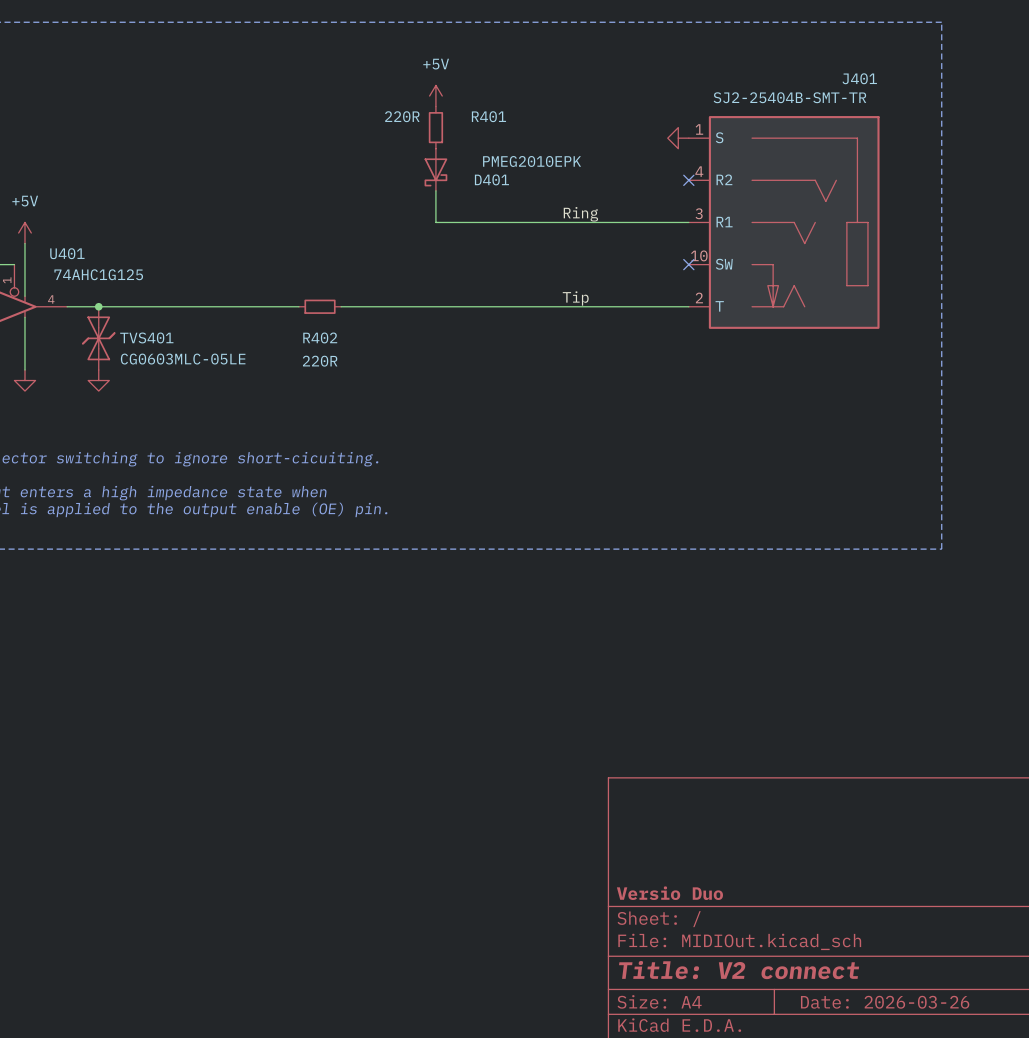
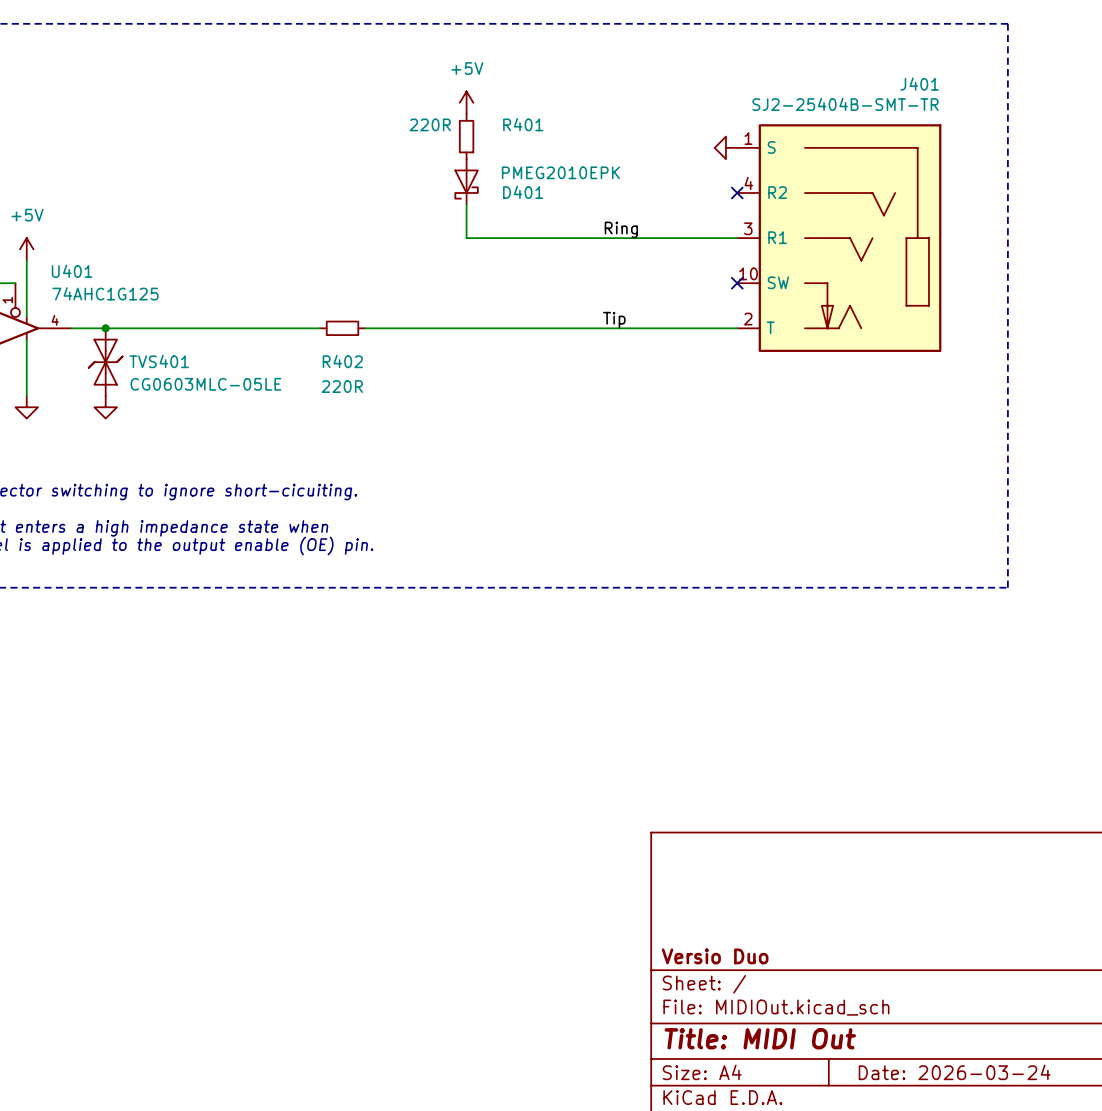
title block: Title: V2 connect (739, 970) -> Title: MIDI Out (760, 1038)
title block: Date: 2026-03-26 (885, 1002) -> Date: 2026-03-24 (954, 1072)

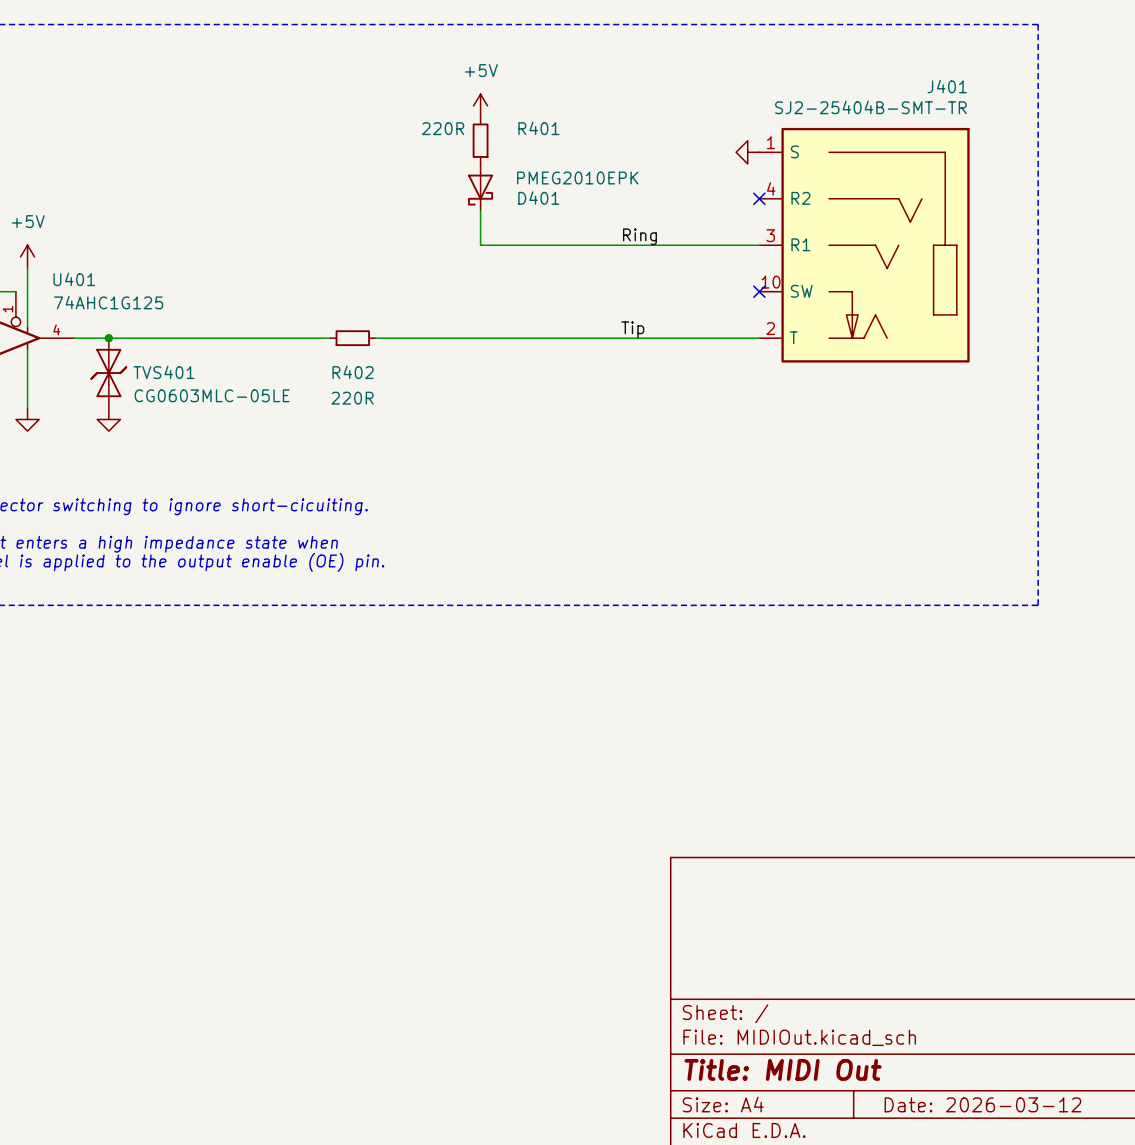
title block: Versio Duo (715, 956) -> none
title block: Date: 2026-03-24 (954, 1072) -> Date: 2026-03-12 (982, 1104)

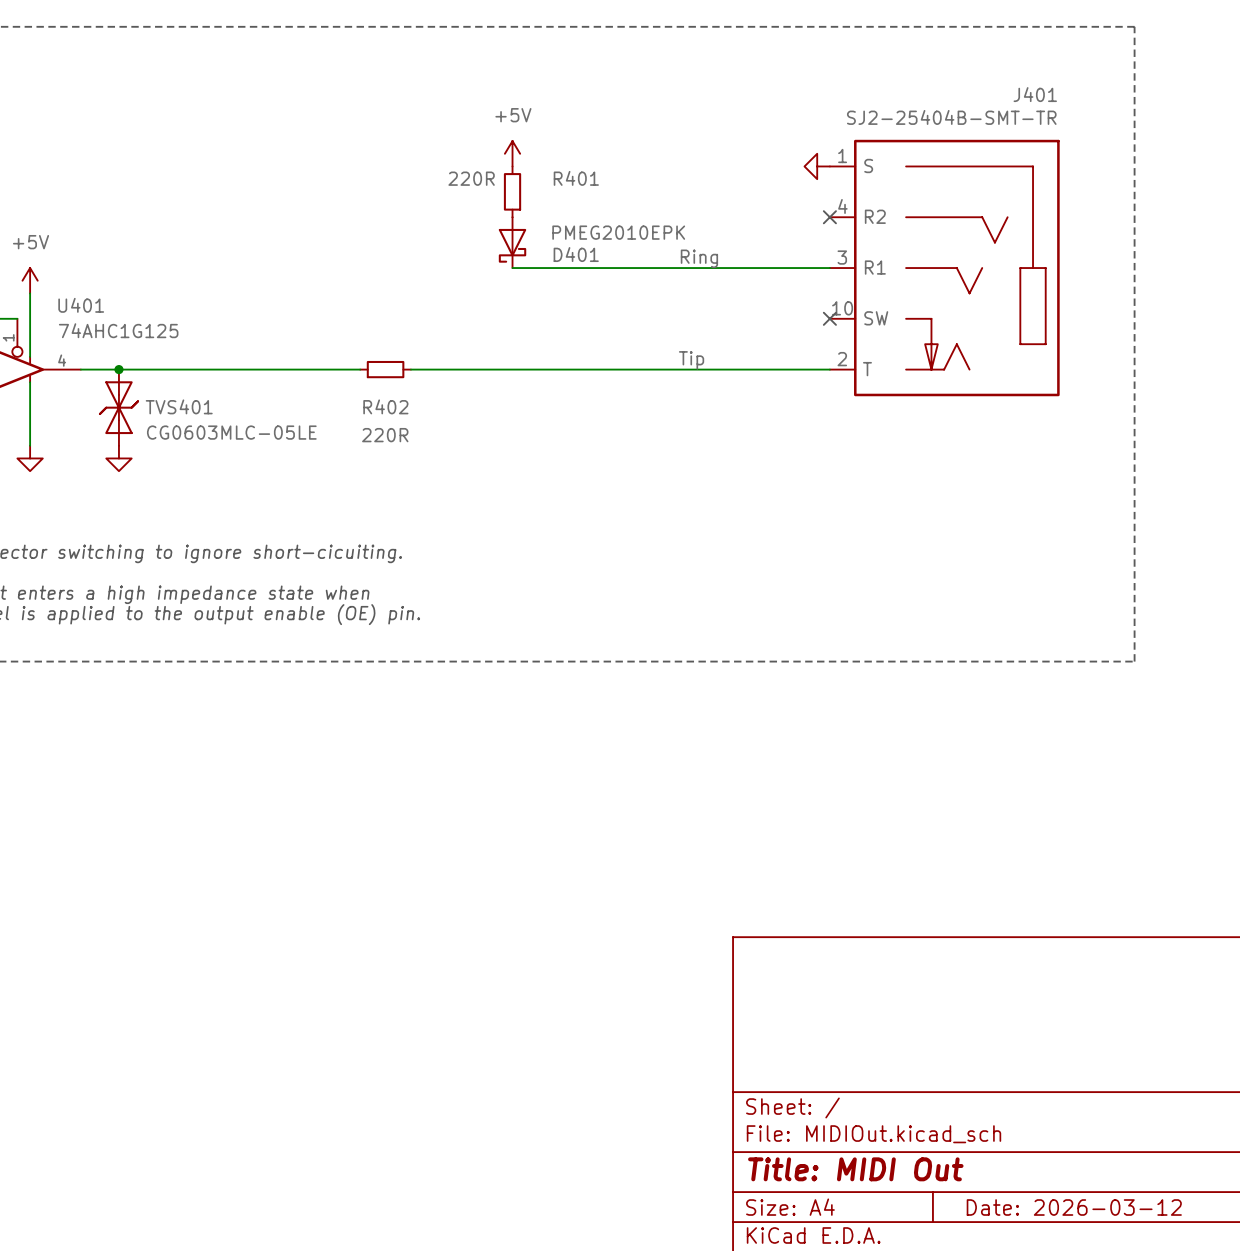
power symbol position: +5V (480, 105) -> +5V (512, 153)
R401 position: (480, 140) -> (512, 191)
D401 position: (480, 187) -> (512, 242)
wire: (480, 210) (480, 245) -> (512, 268) (525, 268)

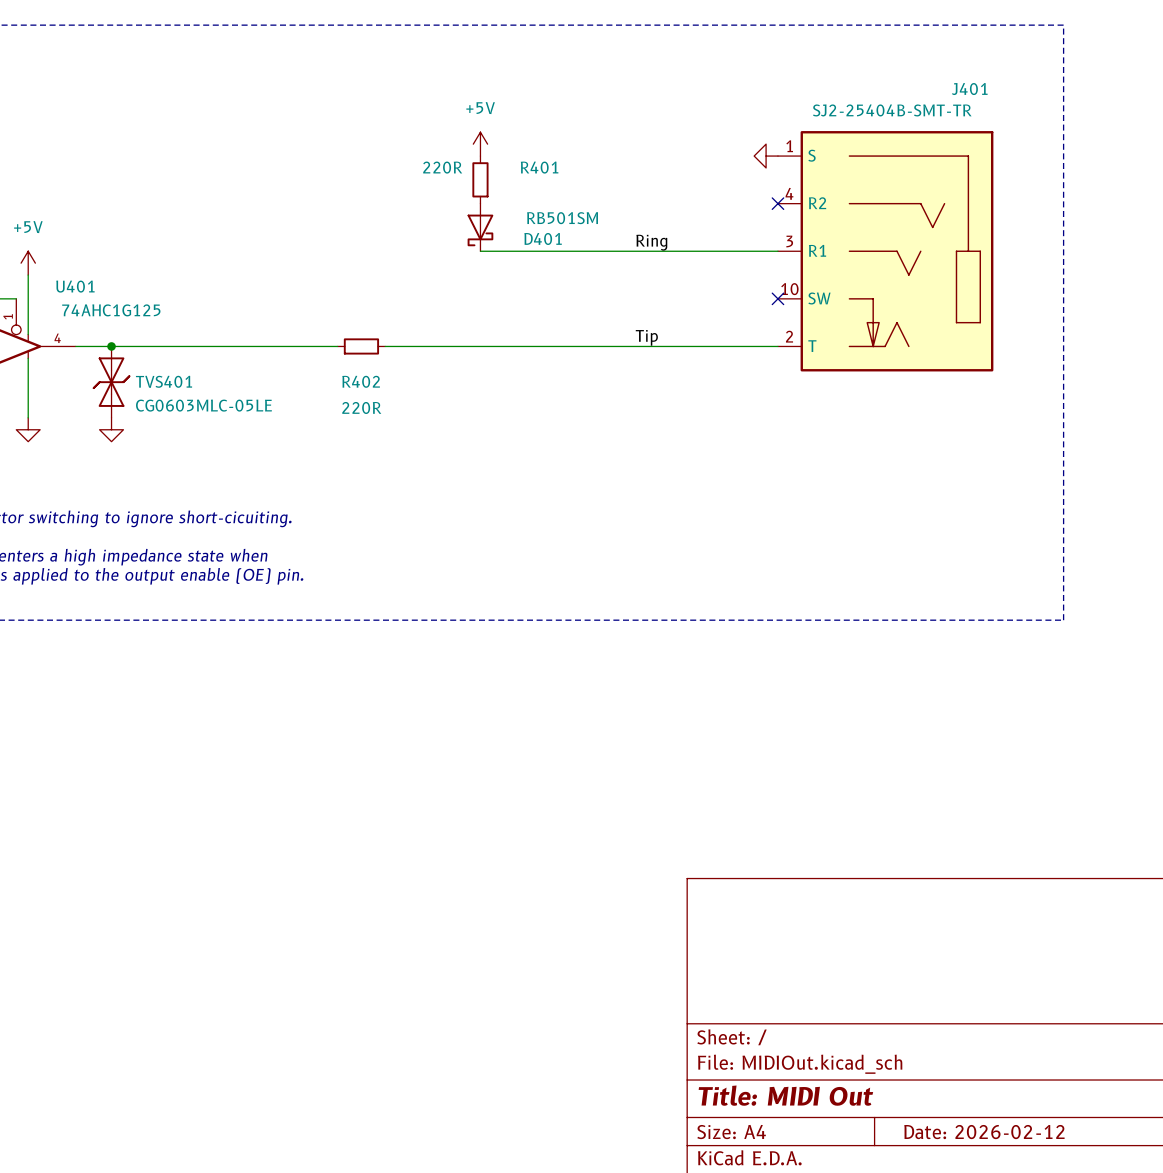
D401 value: PMEG2010EPK (618, 232) -> RB501SM (562, 218)
title block: Date: 2026-03-12 (1074, 1207) -> Date: 2026-02-12 (984, 1132)

